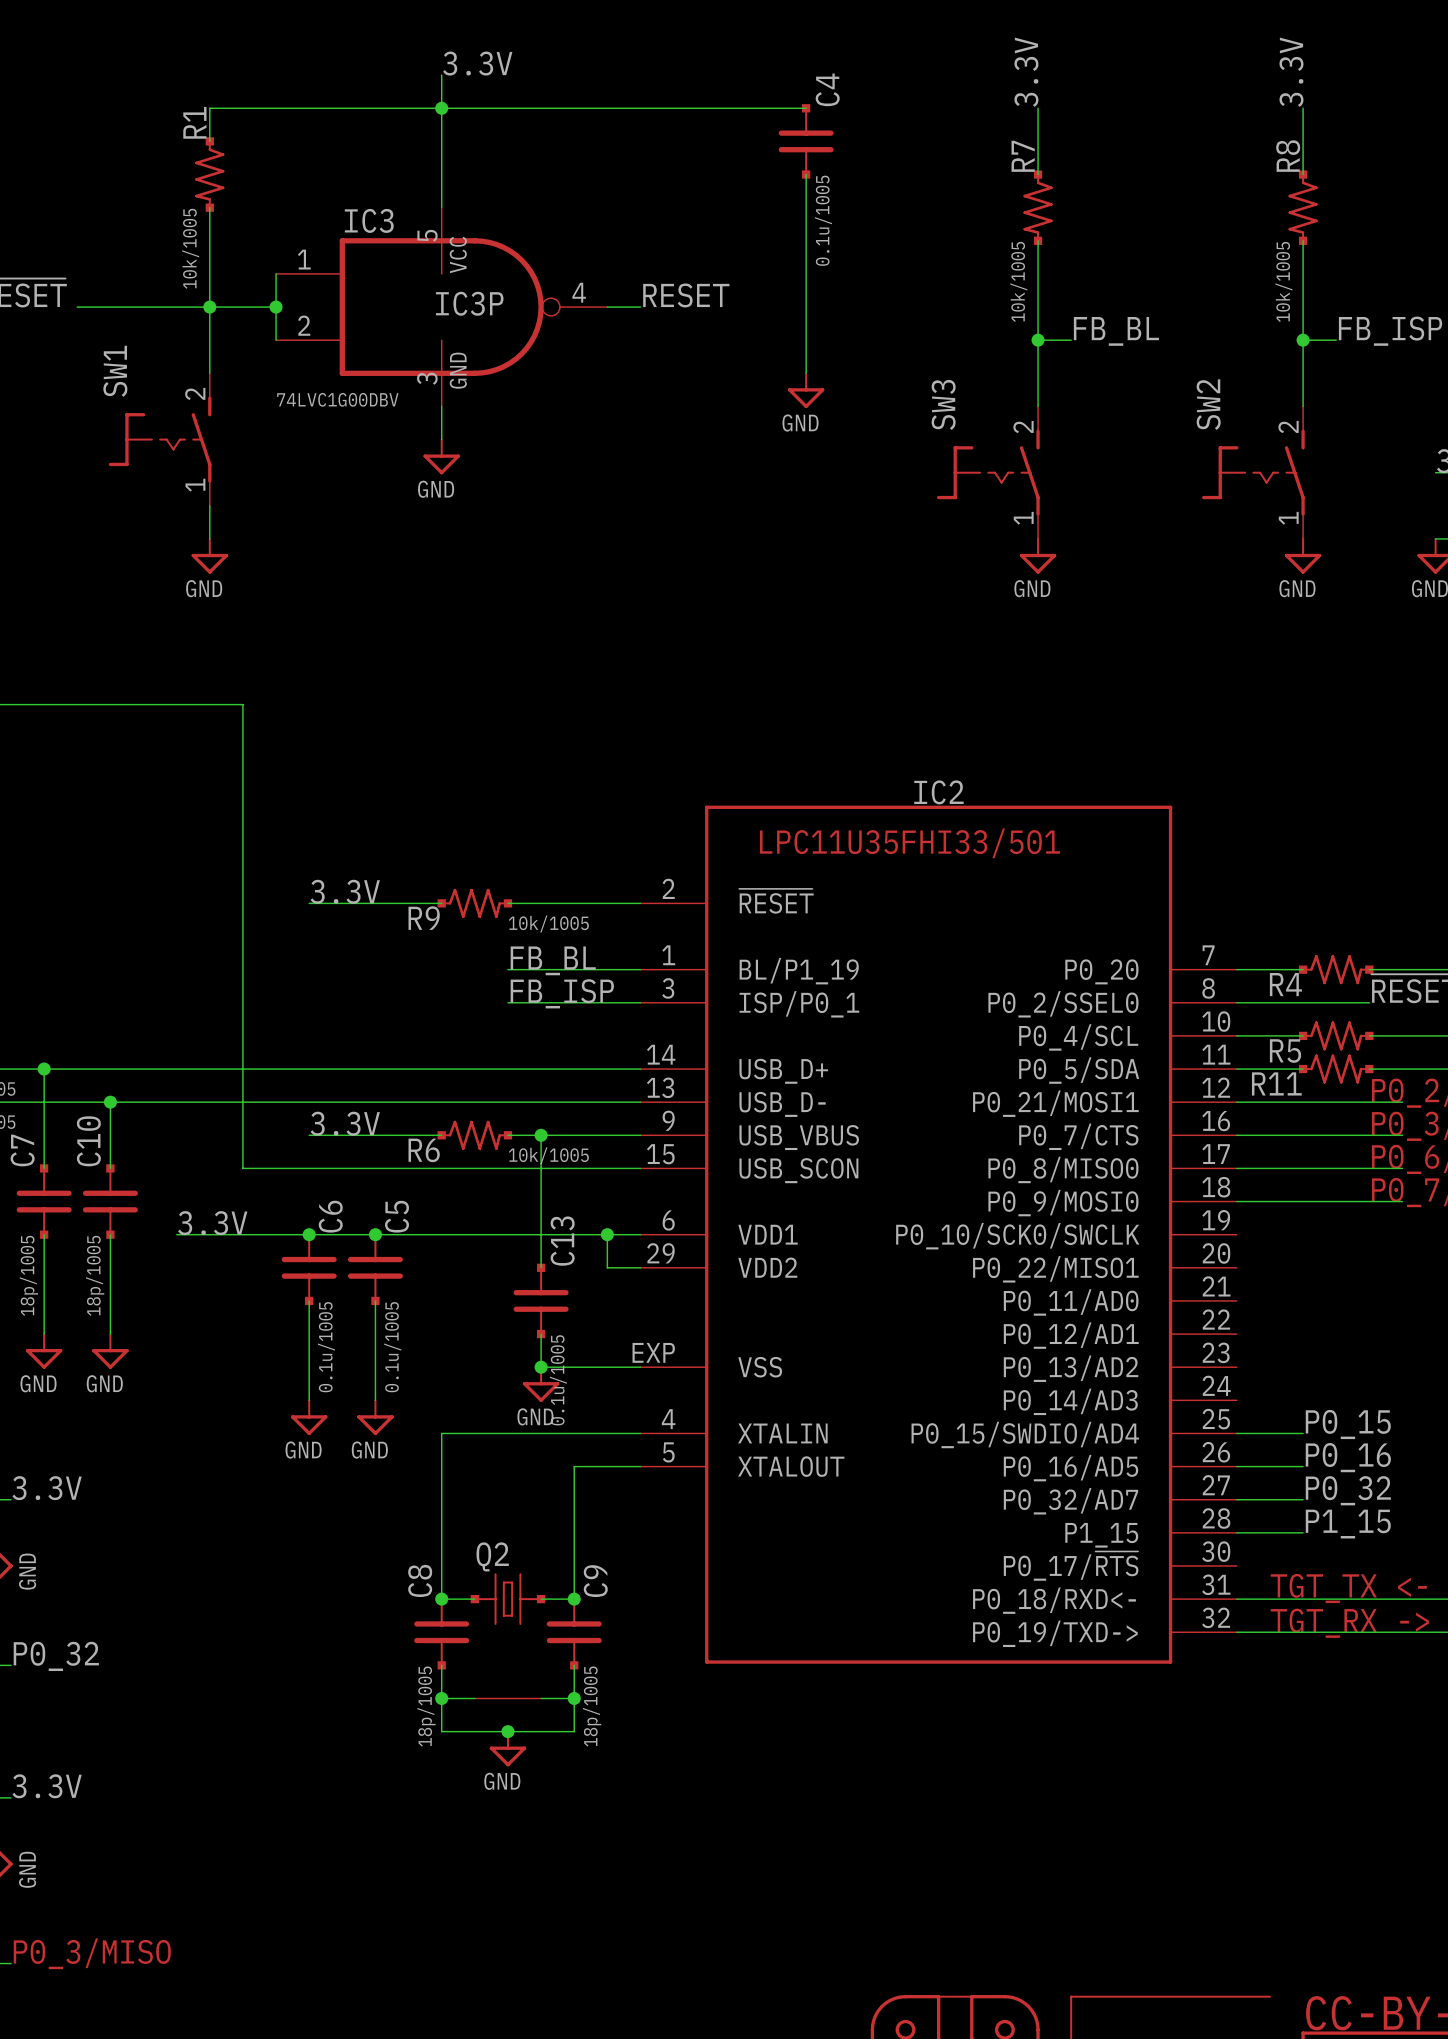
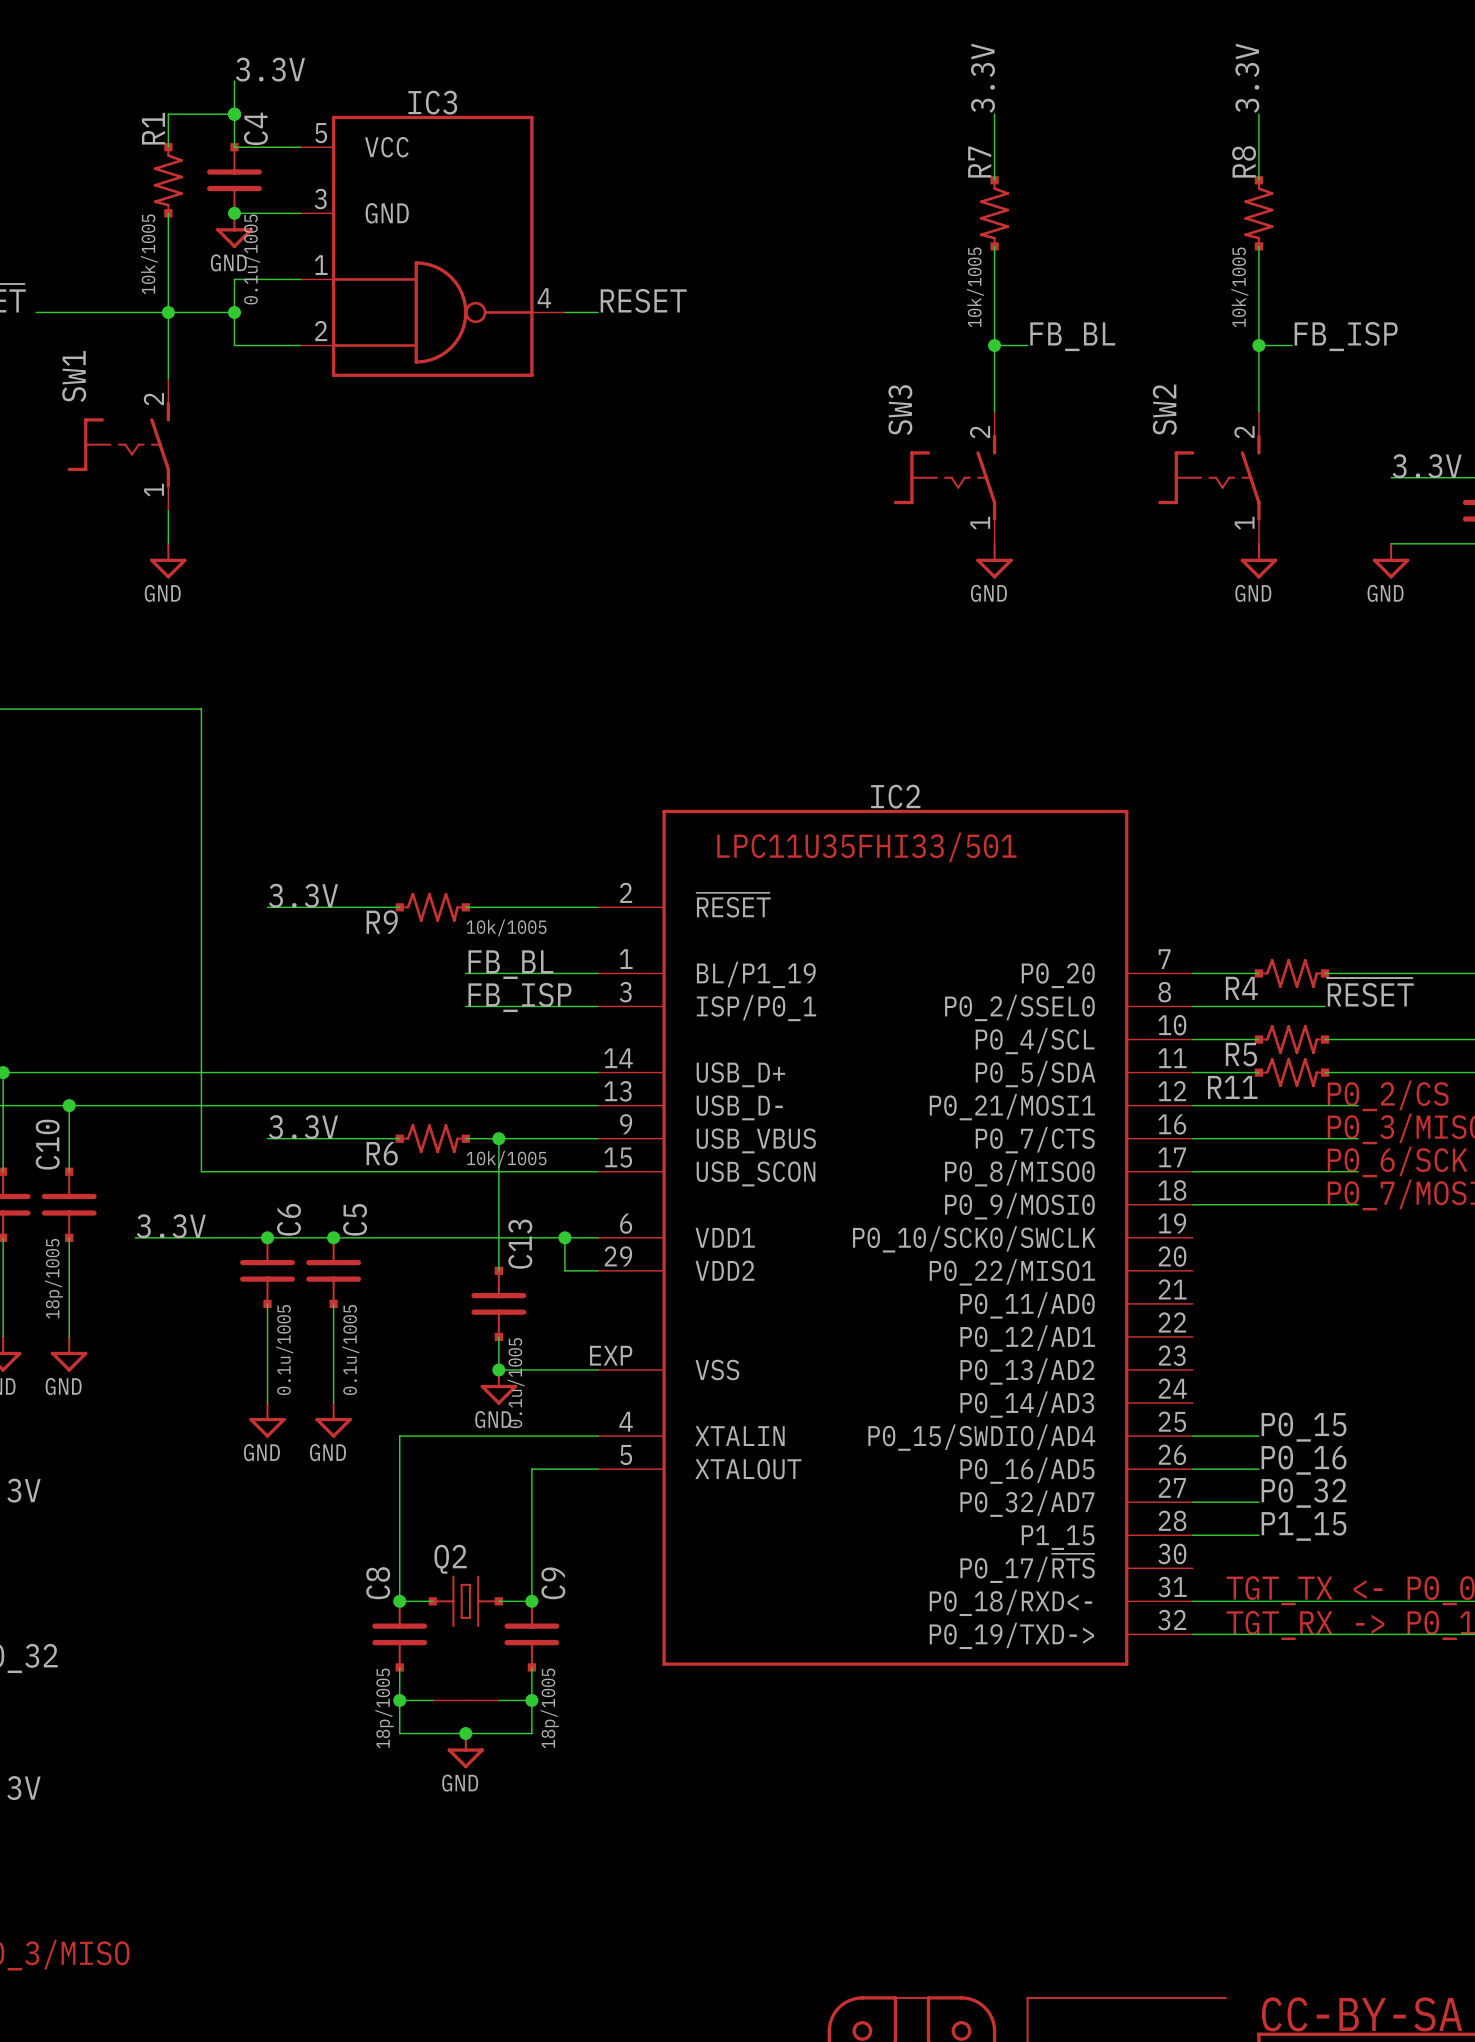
label position: 3.3V (477, 63) -> 3.3V (270, 69)
wire: none -> (234, 81) (234, 147) (300, 147)
wire: (441, 75) (441, 207) -> none
wire: (276, 108) (806, 108) -> none
junction: none -> (234, 114)
junction: (441, 108) -> none
C4 position: (806, 141) -> (234, 180)
wire: (806, 174) (806, 373) -> none
wire: none -> (234, 213) (300, 213)
junction: none -> (234, 213)
IC3 name position: IC3 (369, 220) -> IC3 (432, 102)
power symbol: none -> GND (234, 230)
IC3 symbol: [276, 238, 608, 376] -> [300, 115, 565, 377]
IC3P: (441, 307) -> none
power symbol: GND (806, 390) -> none
IC3 value: 74LVC1G00DBV (337, 399) -> none
wire: (441, 406) (441, 439) -> none
power symbol: GND (441, 456) -> none

